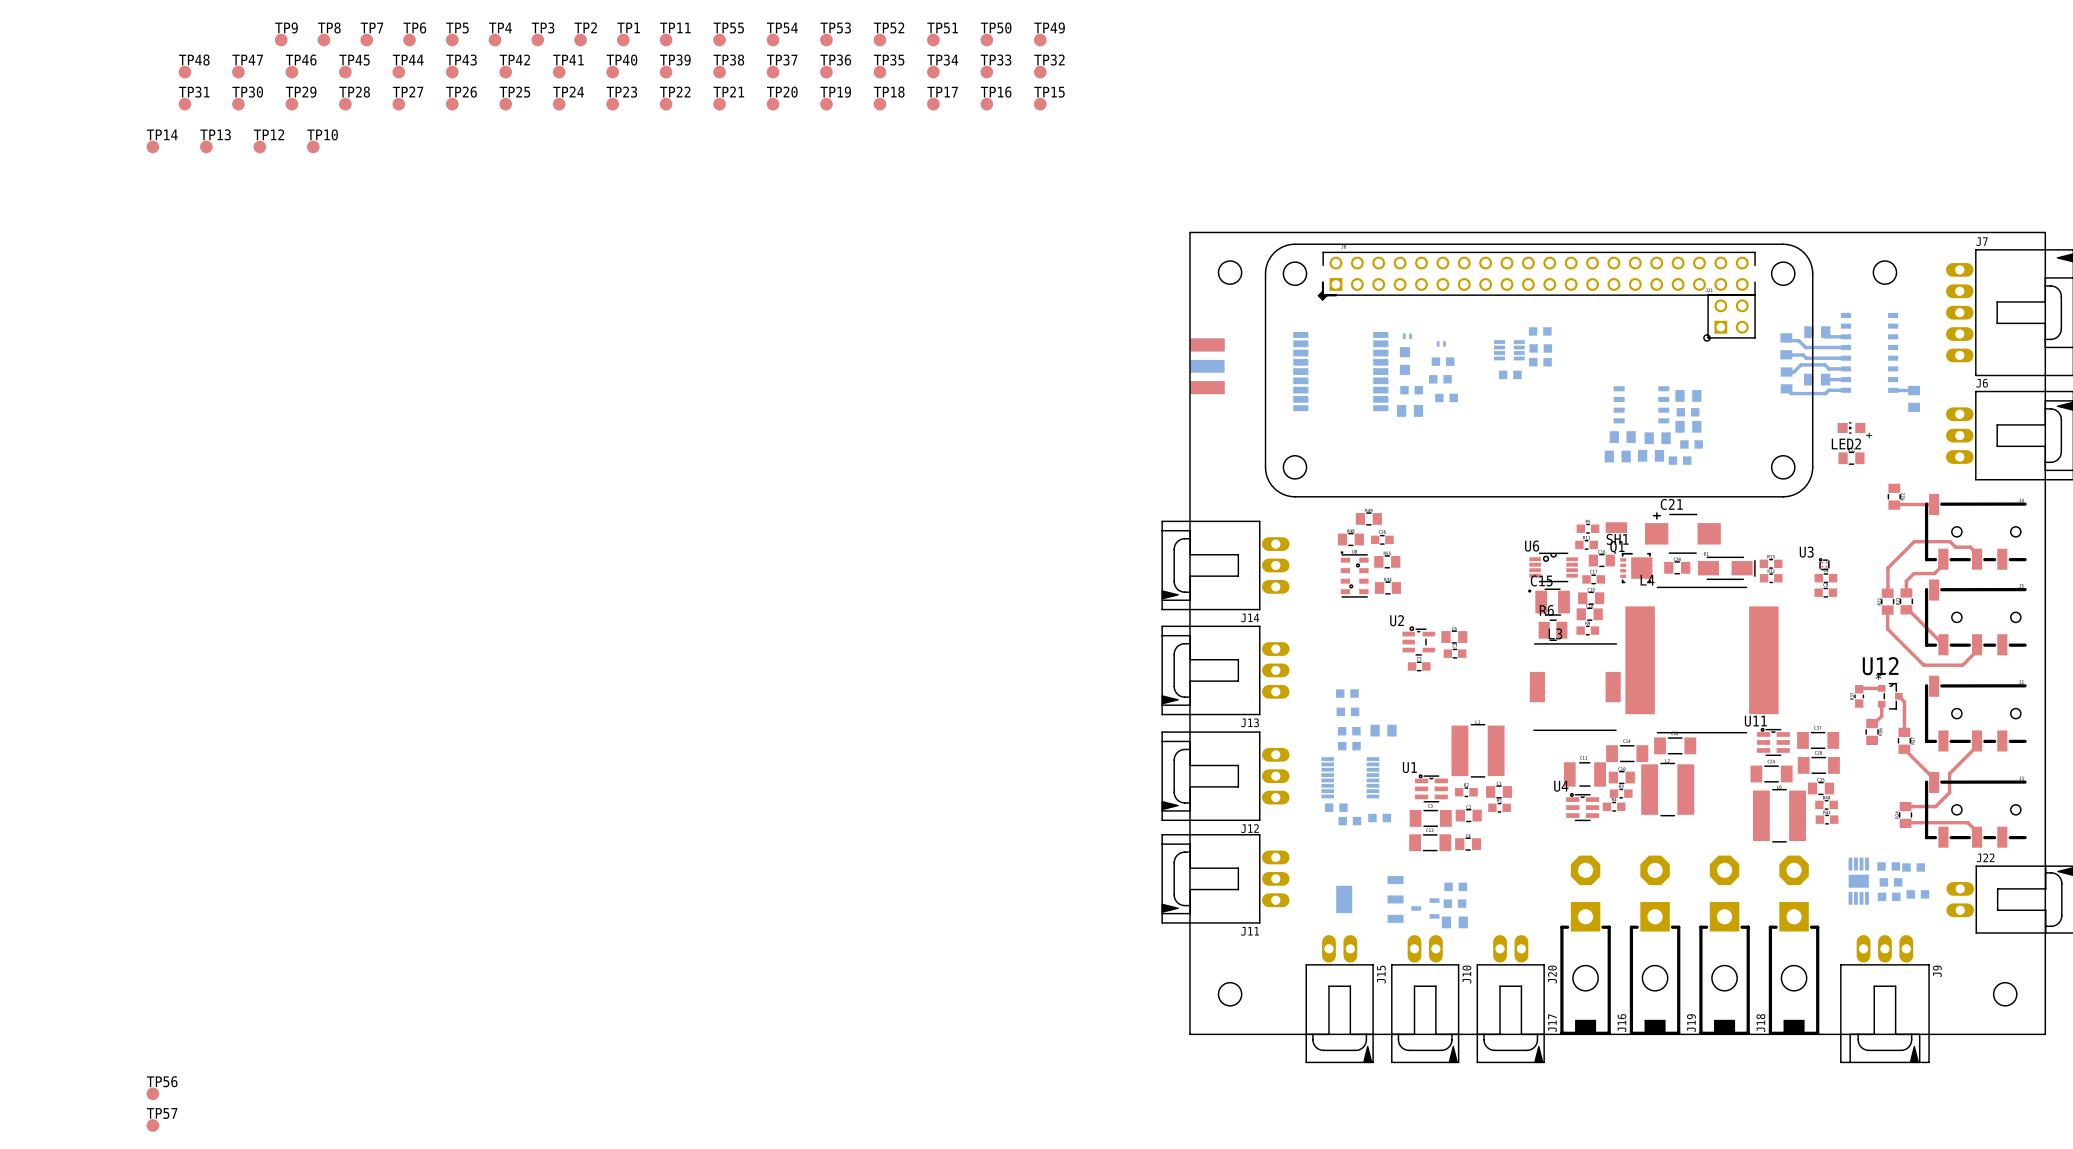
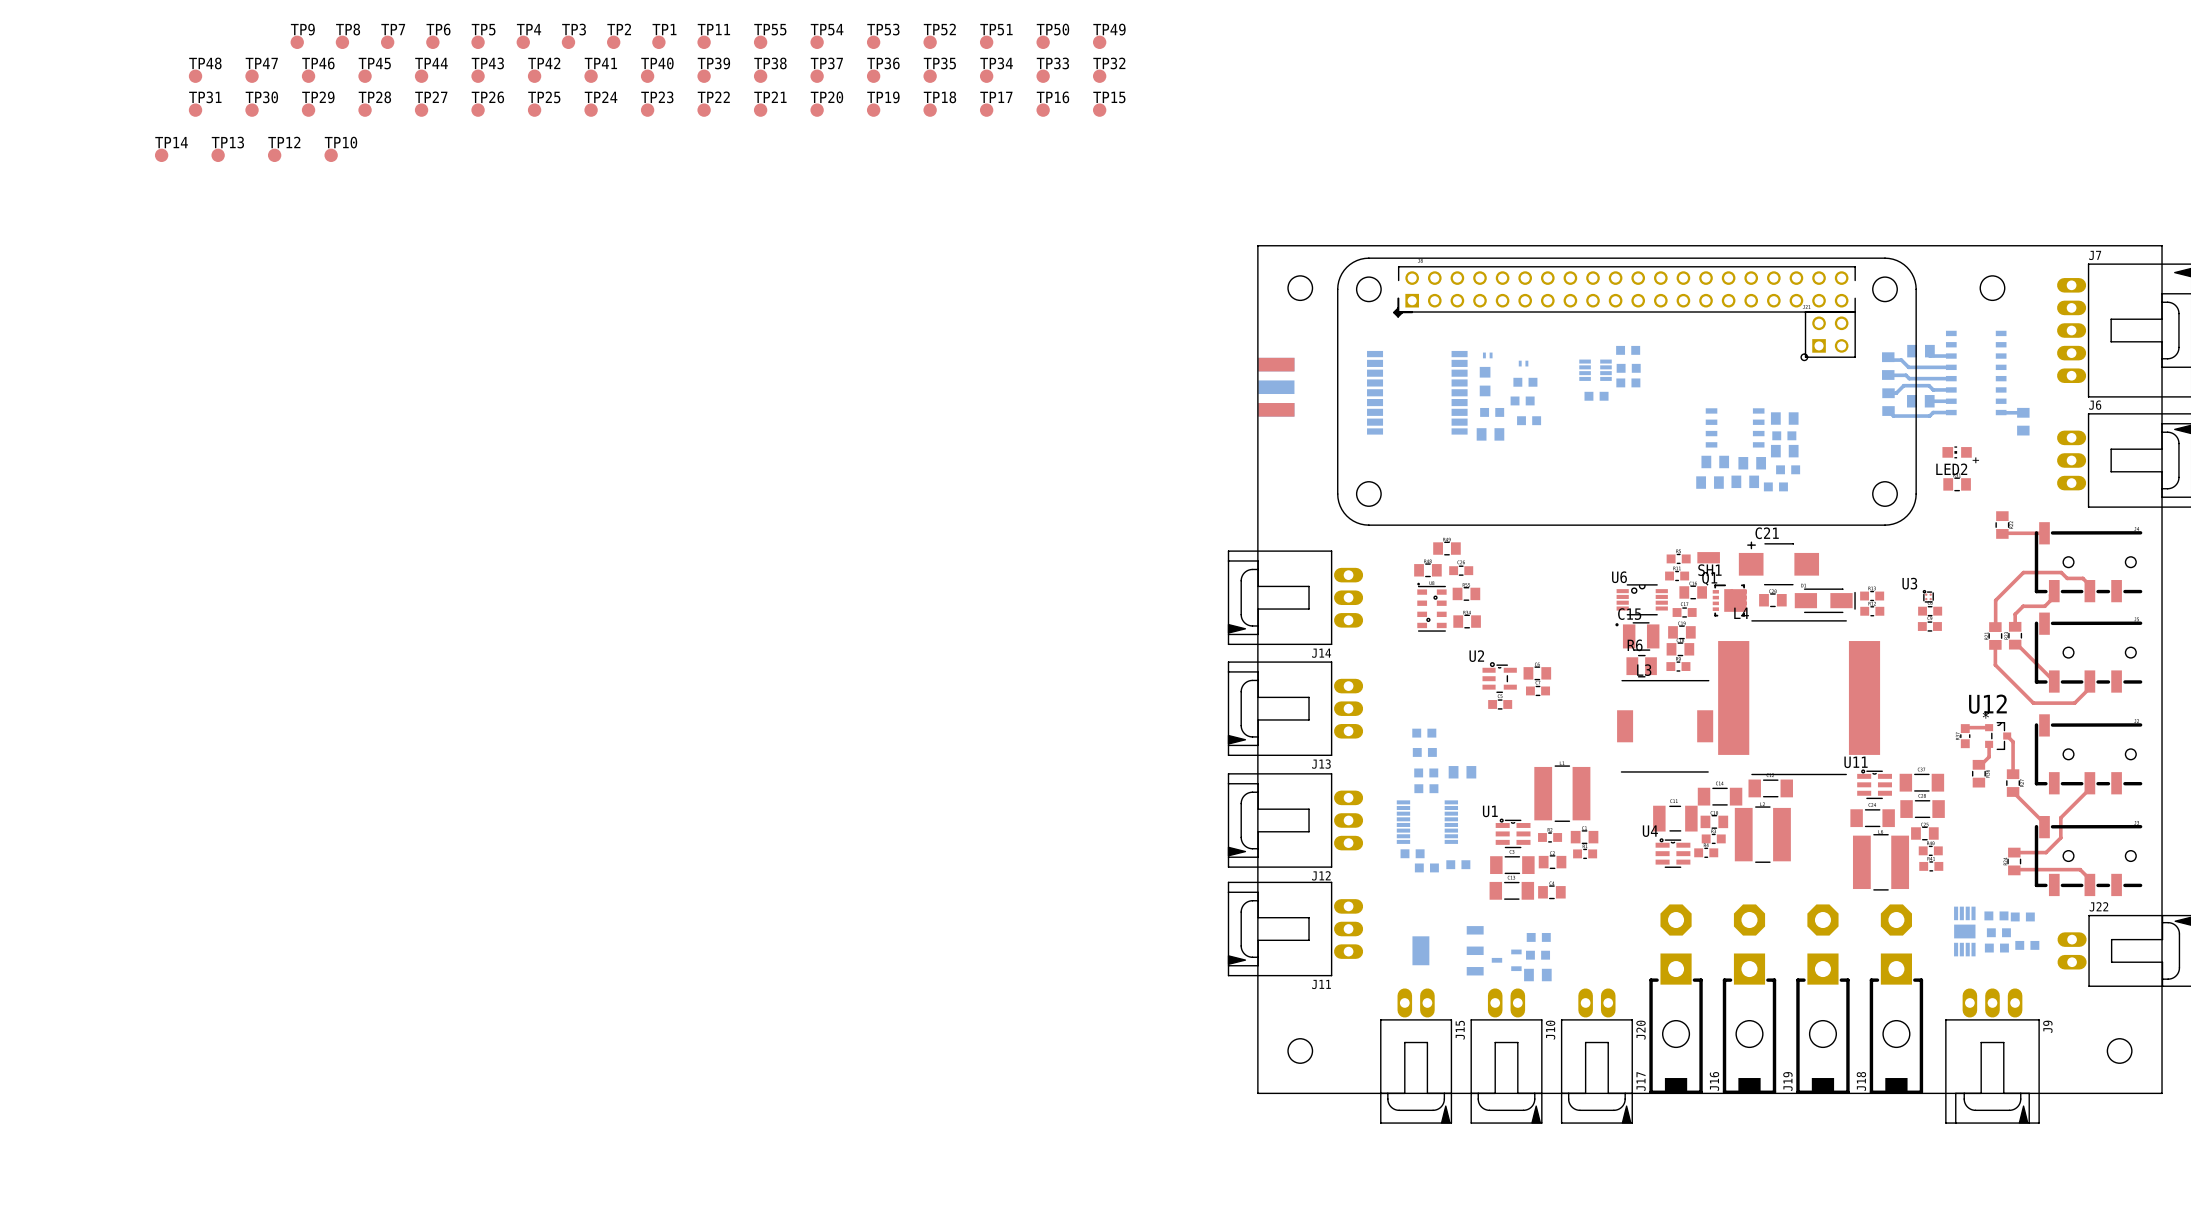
TP56: (152, 1093) -> none
TP57: (152, 1125) -> none

